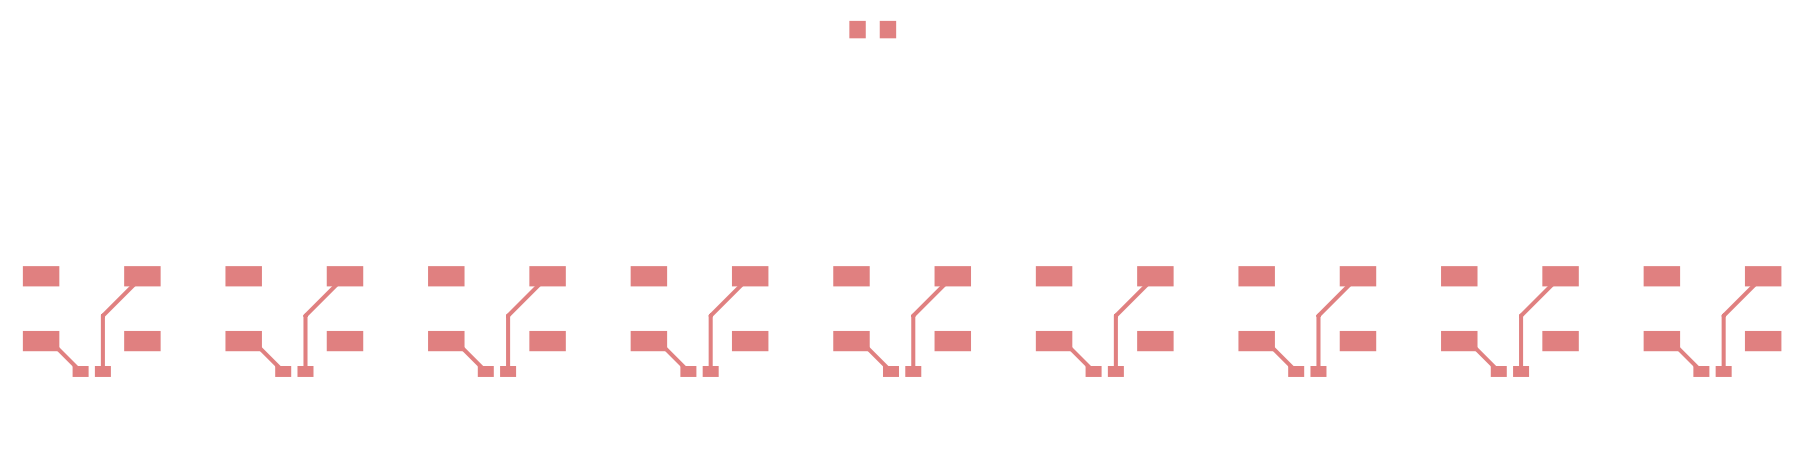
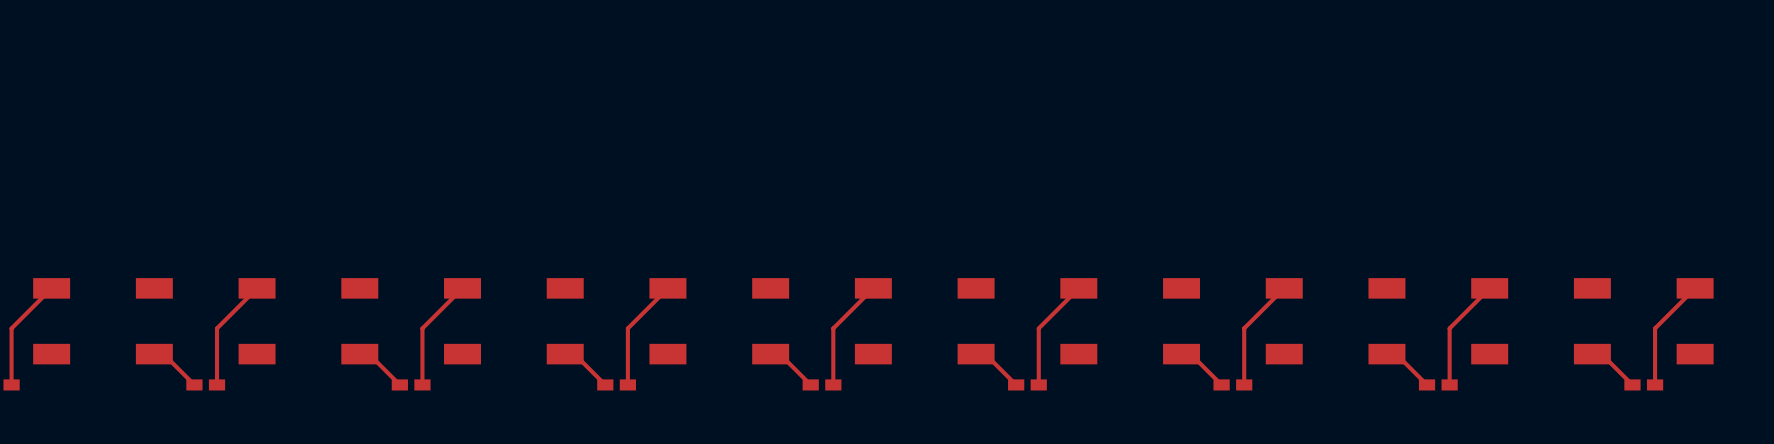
part: (872, 29) -> none

